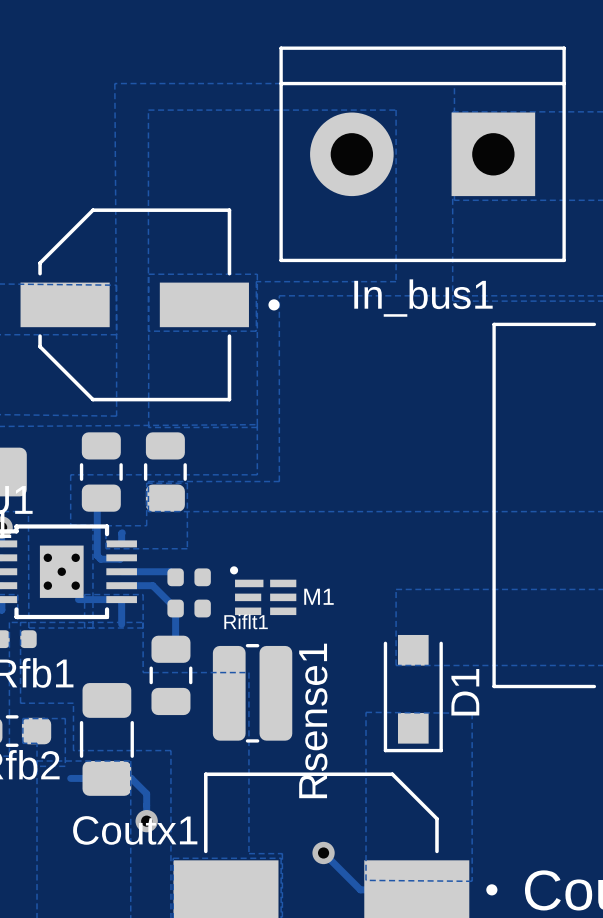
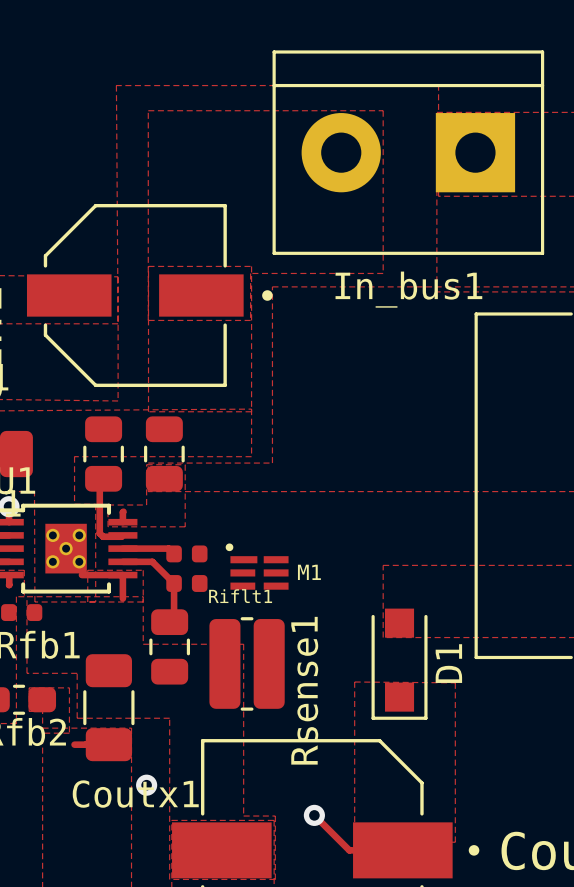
track: (106, 778) (131, 778) (146, 793) (146, 821) -> none

